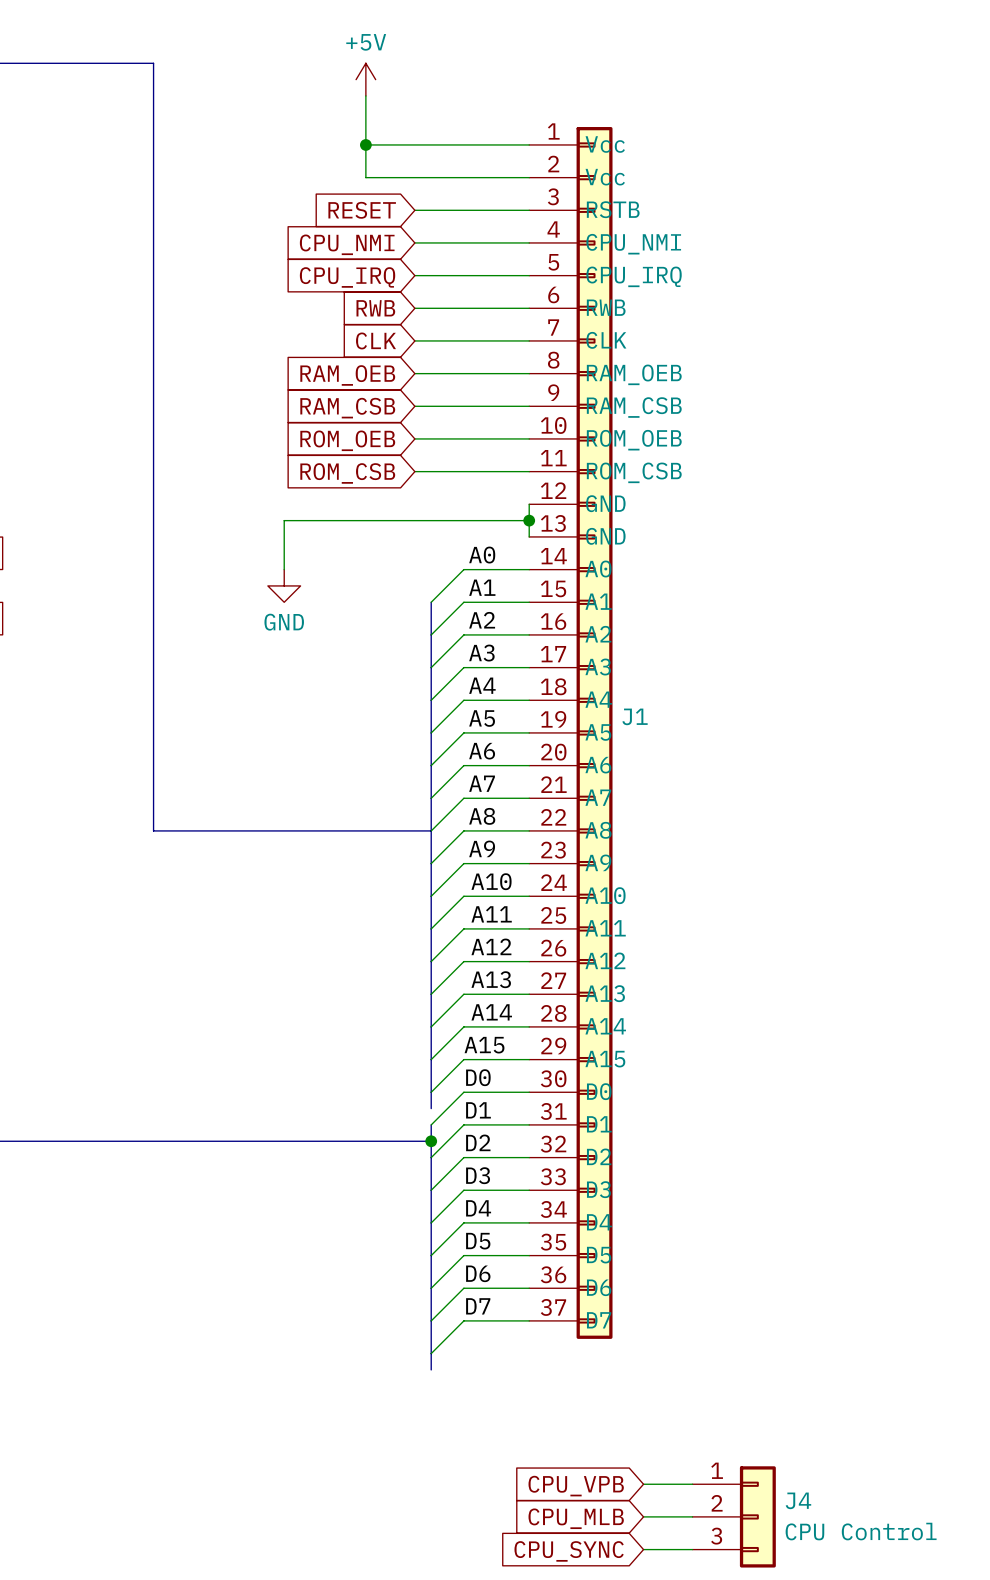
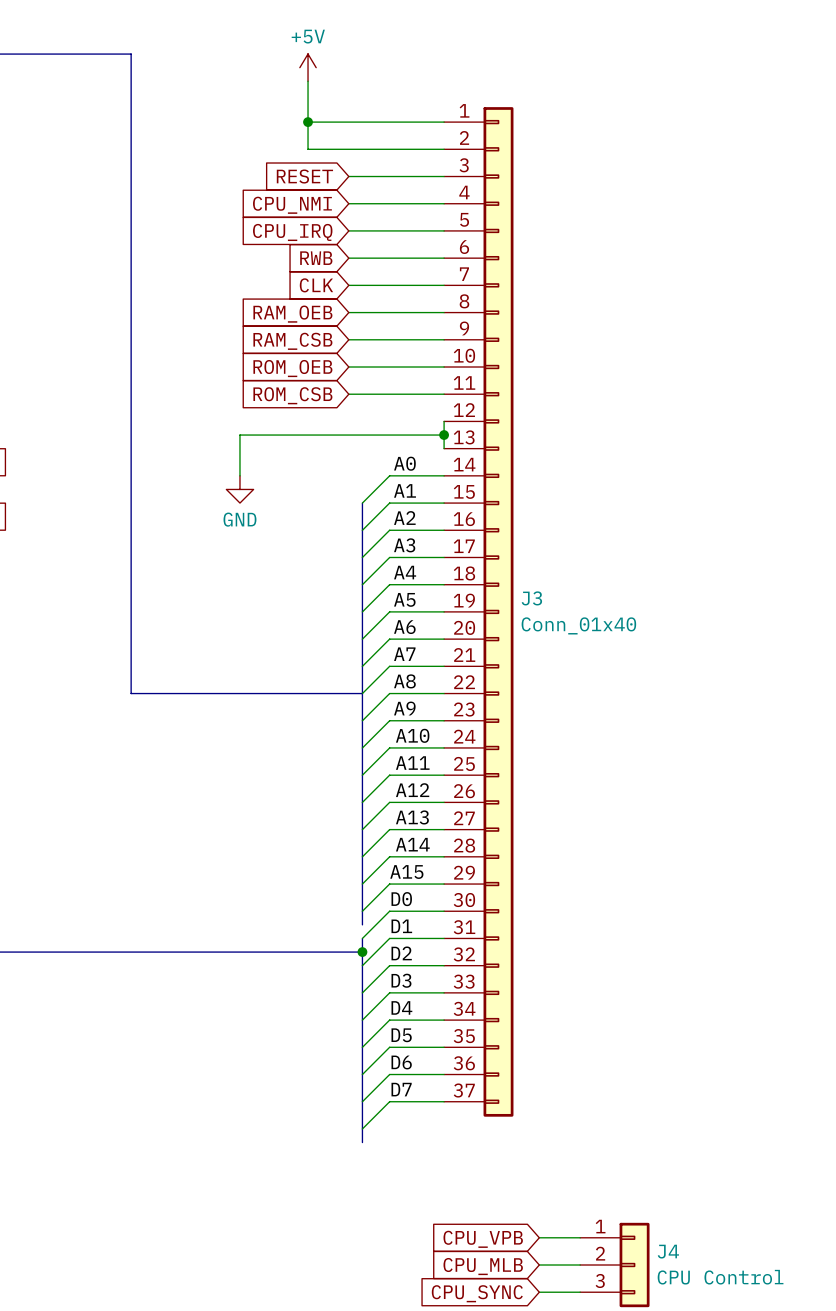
J1 symbol: [529, 127, 613, 1339] -> [444, 107, 514, 1117]
J1 name: J1 (635, 716) -> J3 (531, 598)
J1 value: none -> Conn_01x40 (578, 625)

